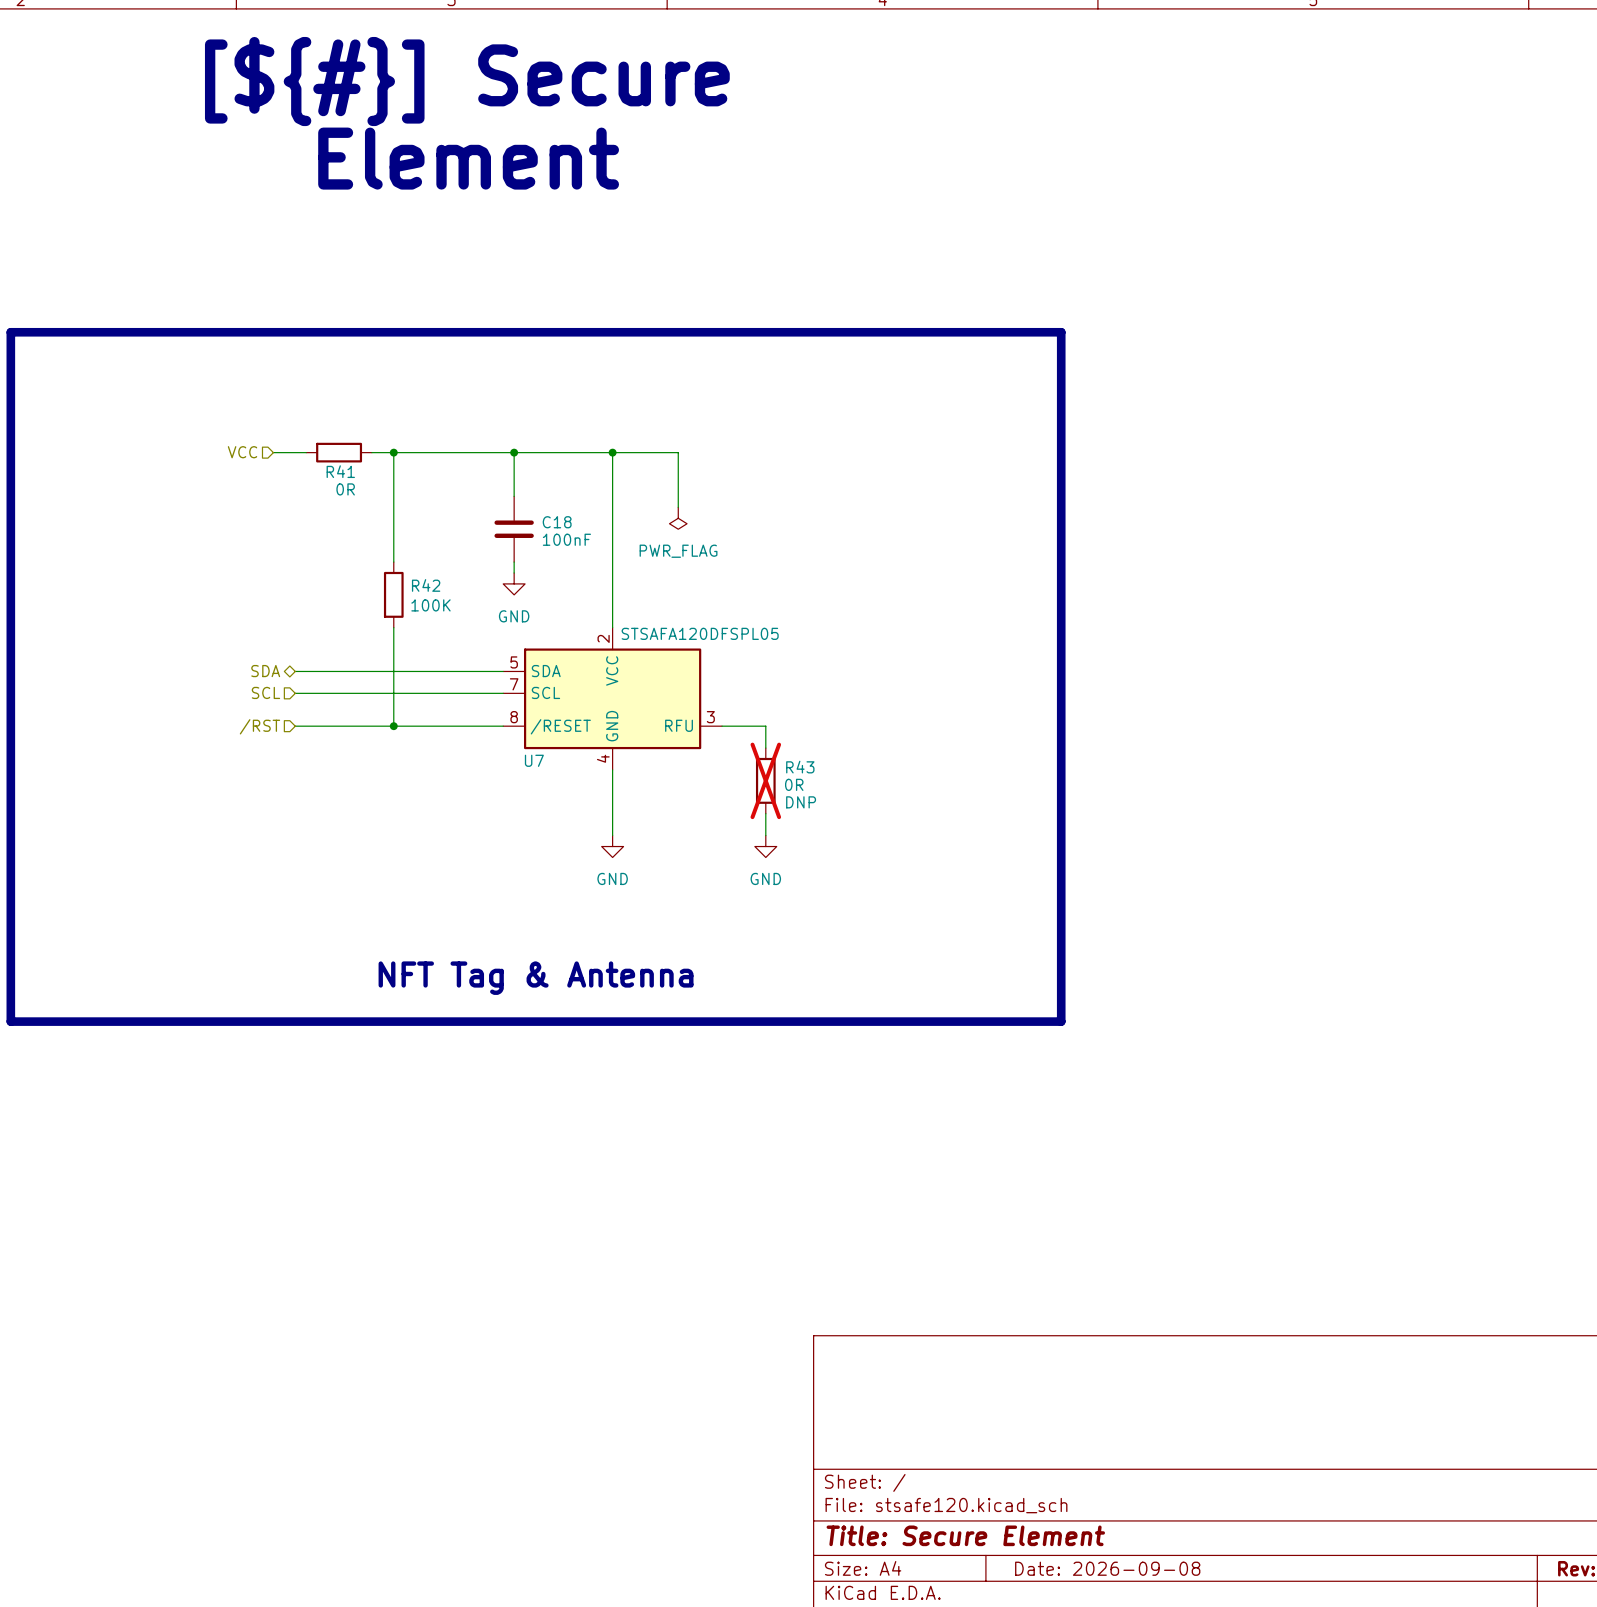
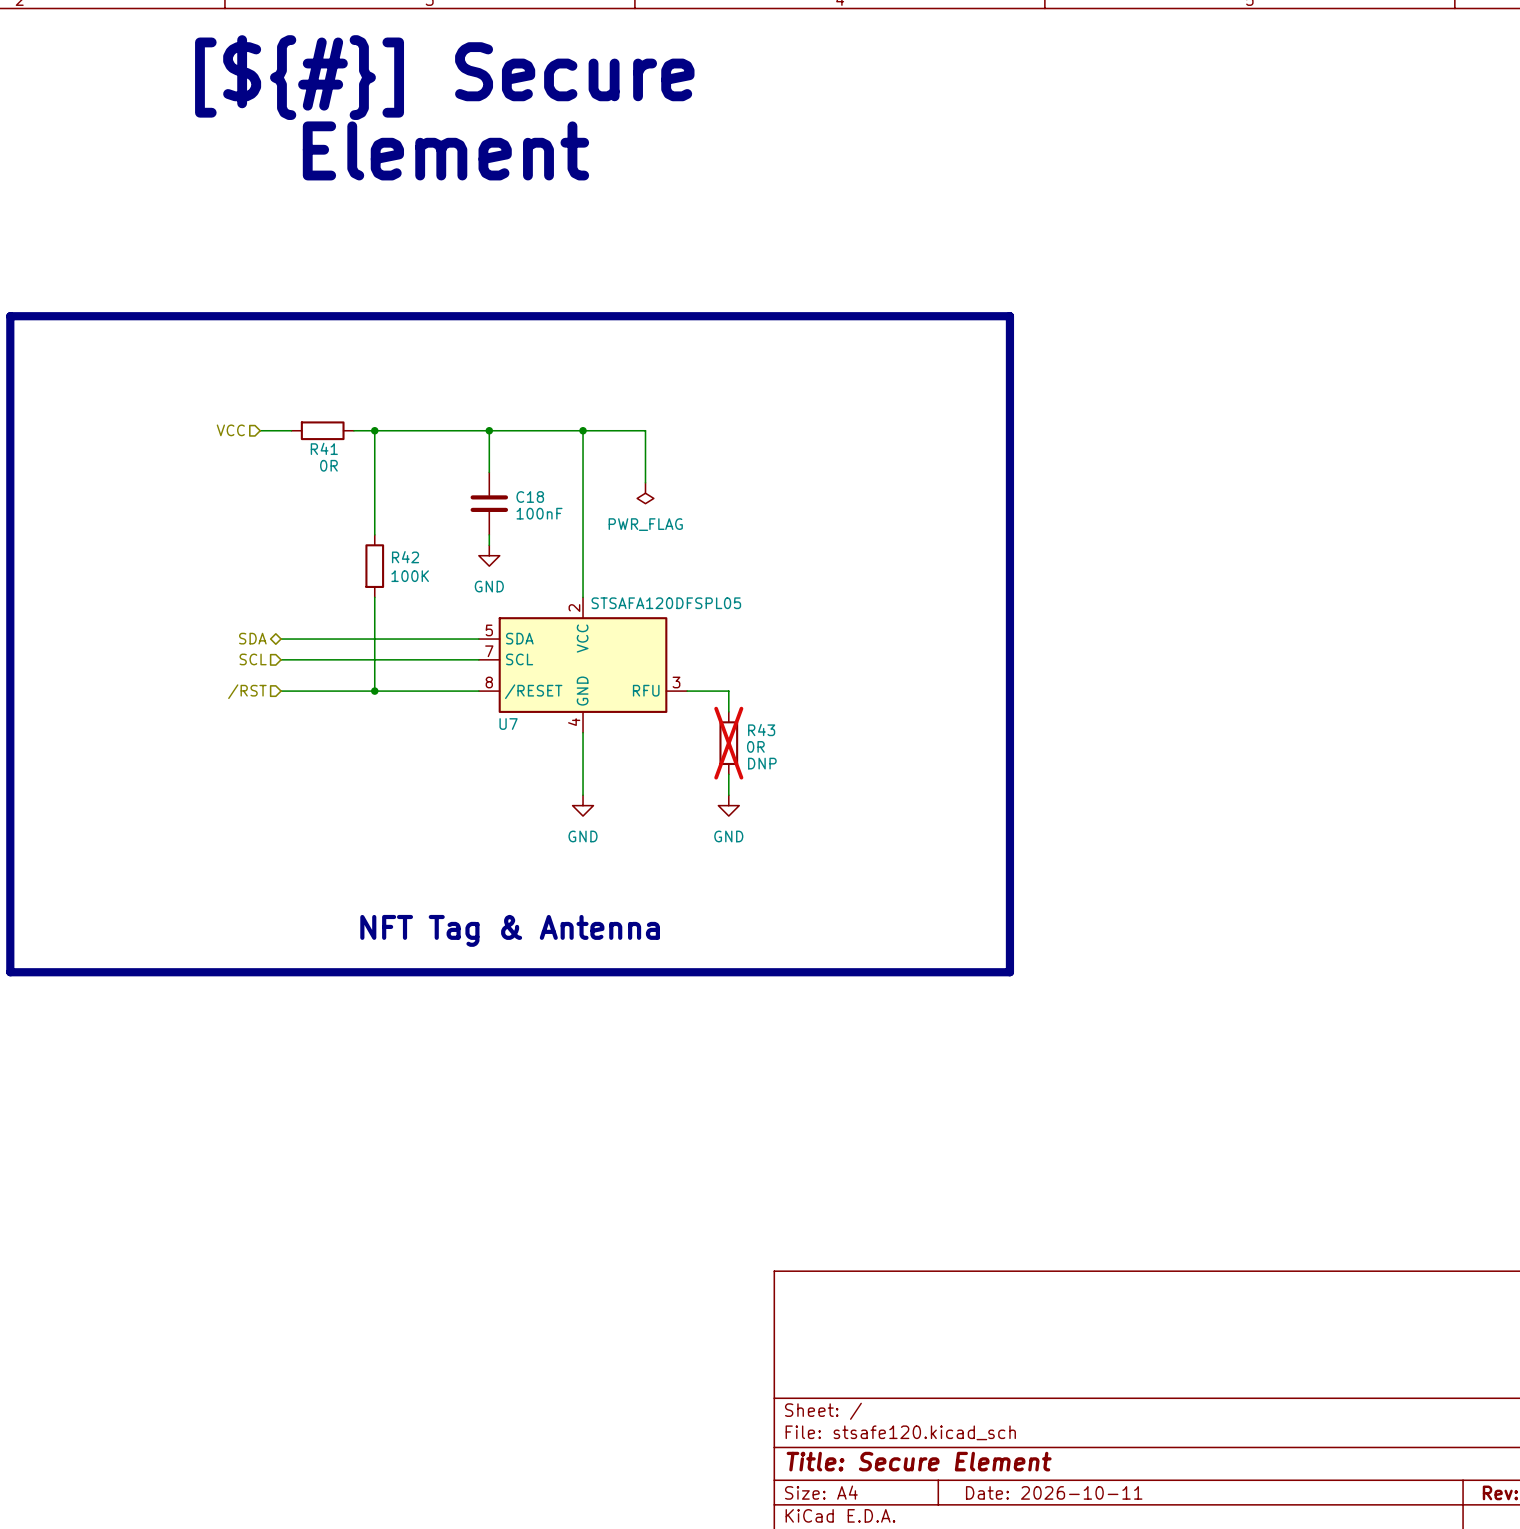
title block: Date: 2026-09-08 (1107, 1568) -> Date: 2026-10-11 (1054, 1492)

